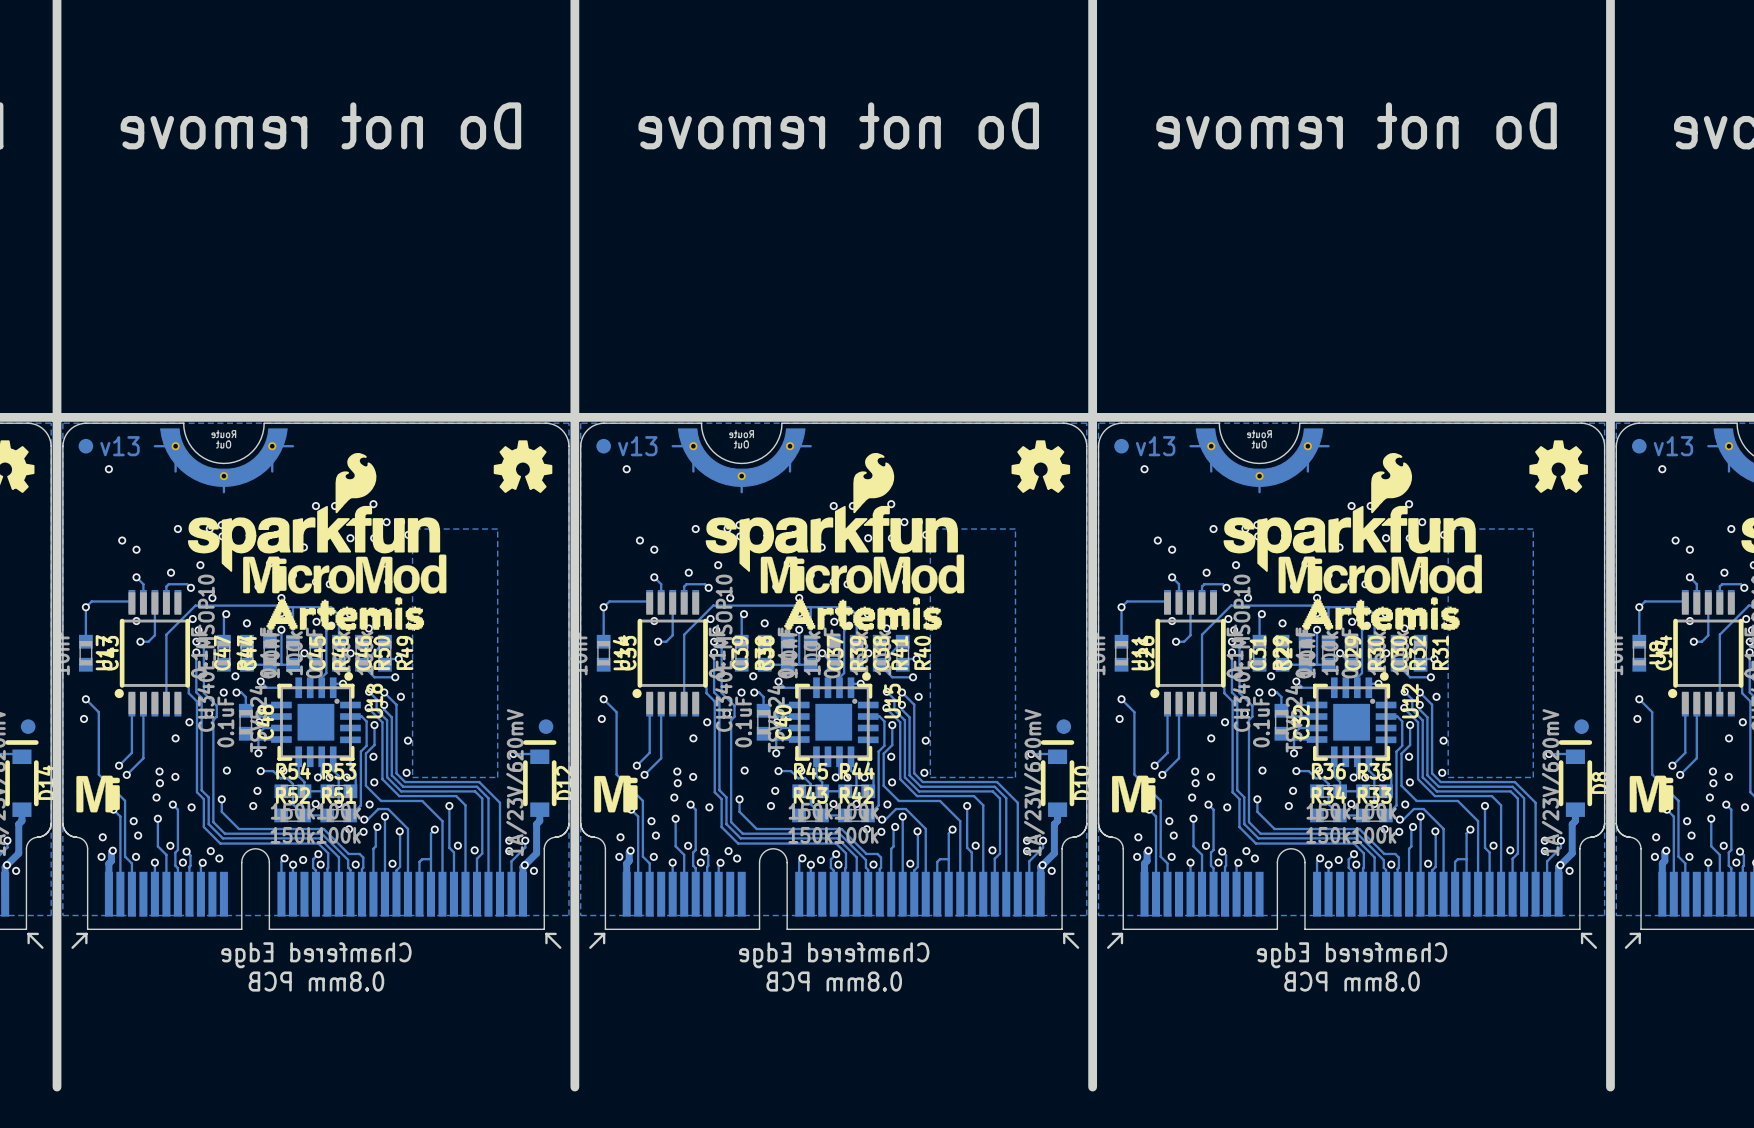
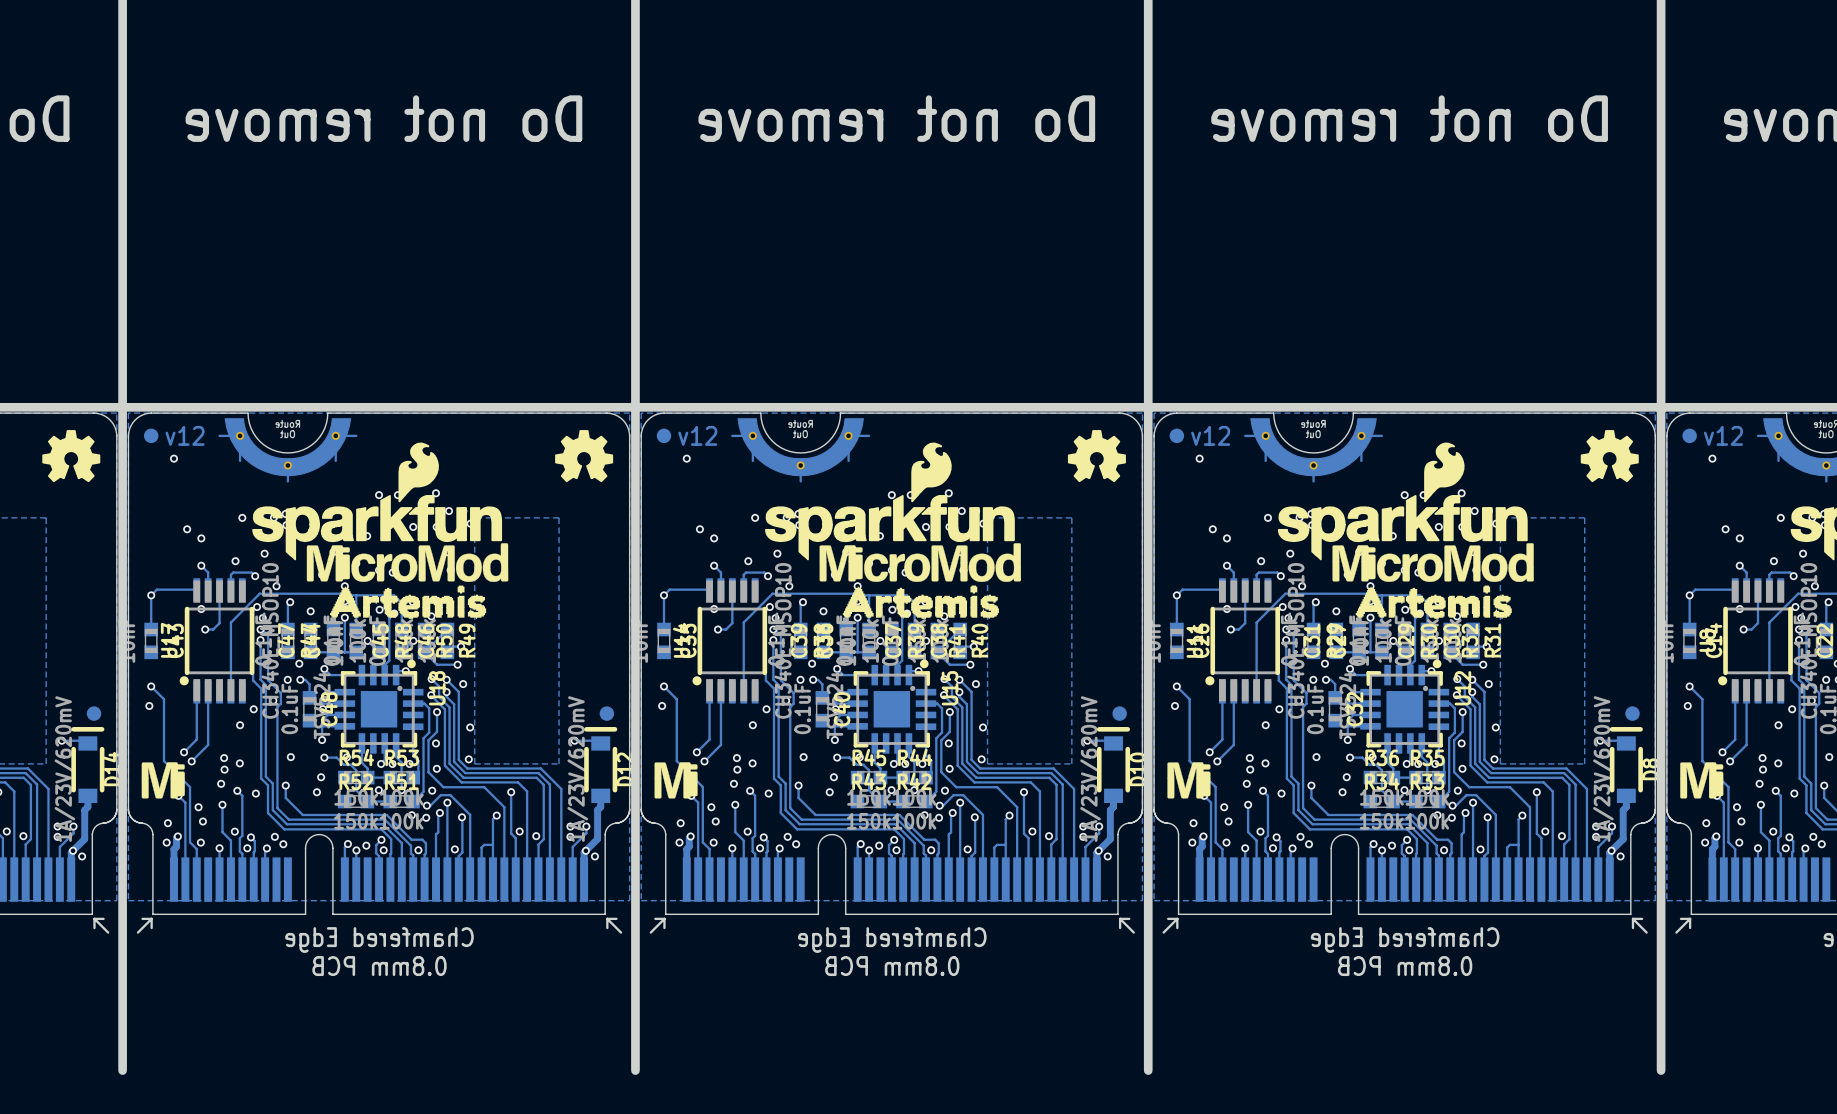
text: v13 (120, 446) -> v12 (185, 435)
text: v13 (637, 446) -> v12 (697, 435)
text: v13 (1155, 446) -> v12 (1210, 435)
text: v13 (1673, 446) -> v12 (1723, 435)

